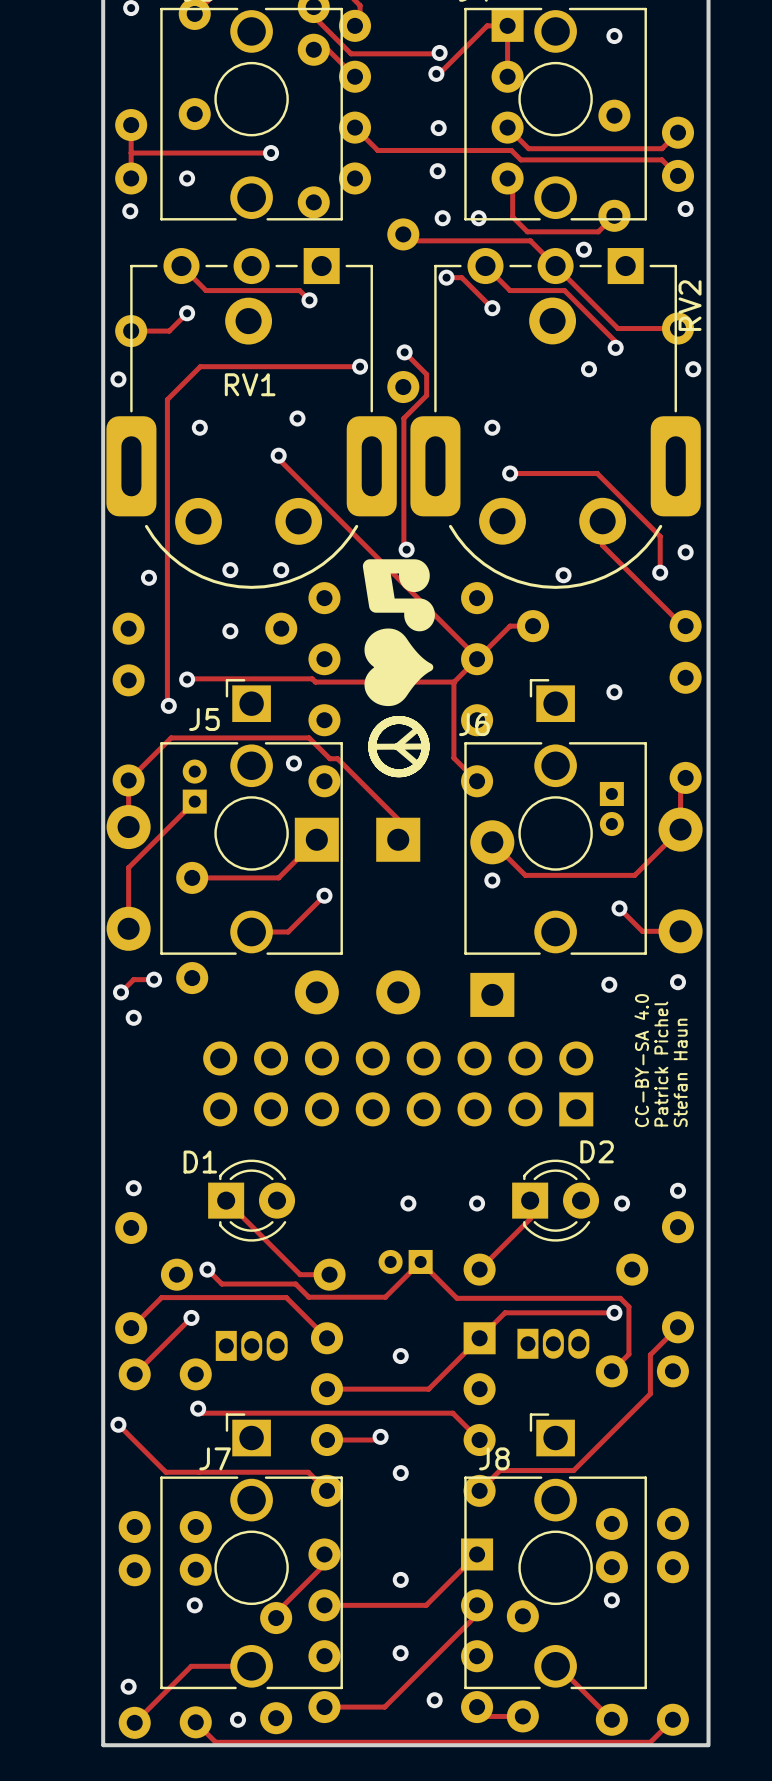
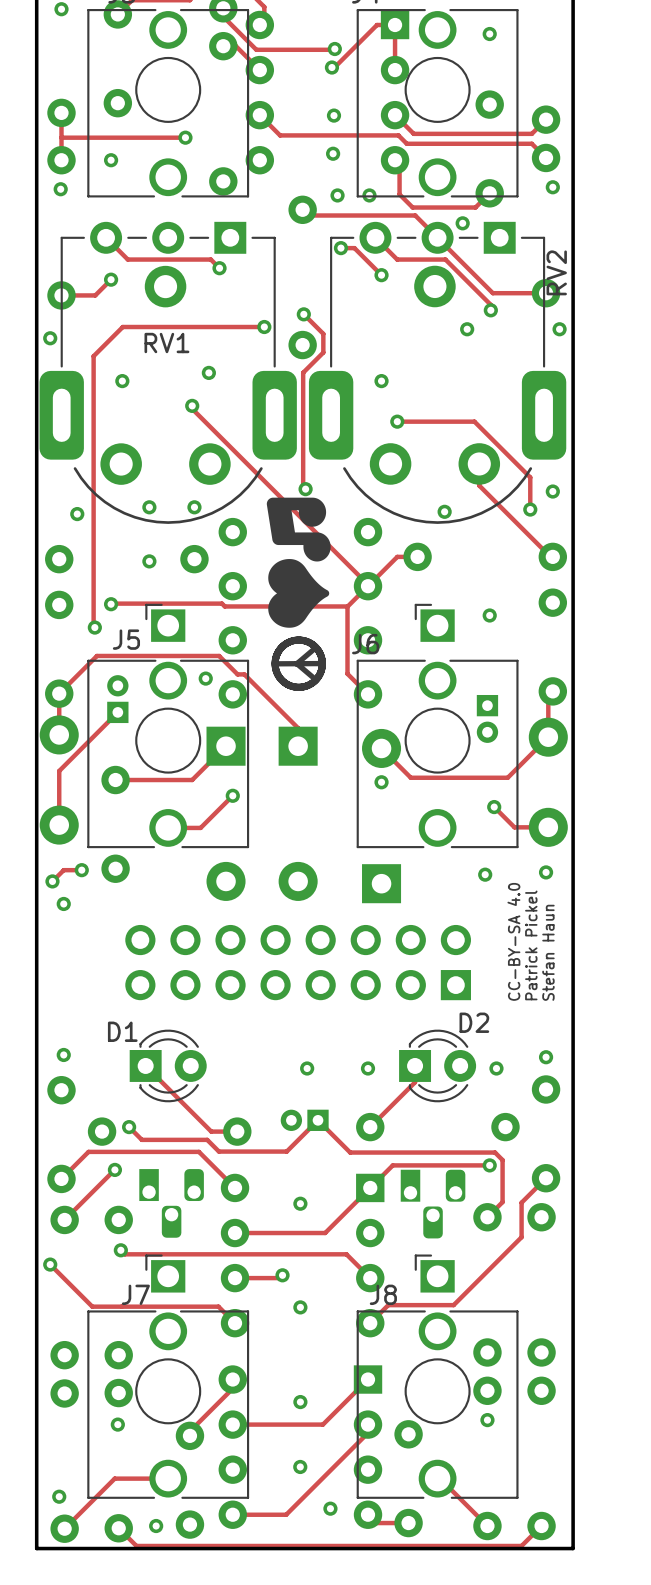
text: Patrick Pichel (661, 1064) -> Patrick Pickel (531, 945)
part footprint: [517, 1328, 590, 1359] -> [400, 1169, 466, 1239]
part footprint: [215, 1330, 288, 1361] -> [139, 1169, 204, 1238]

